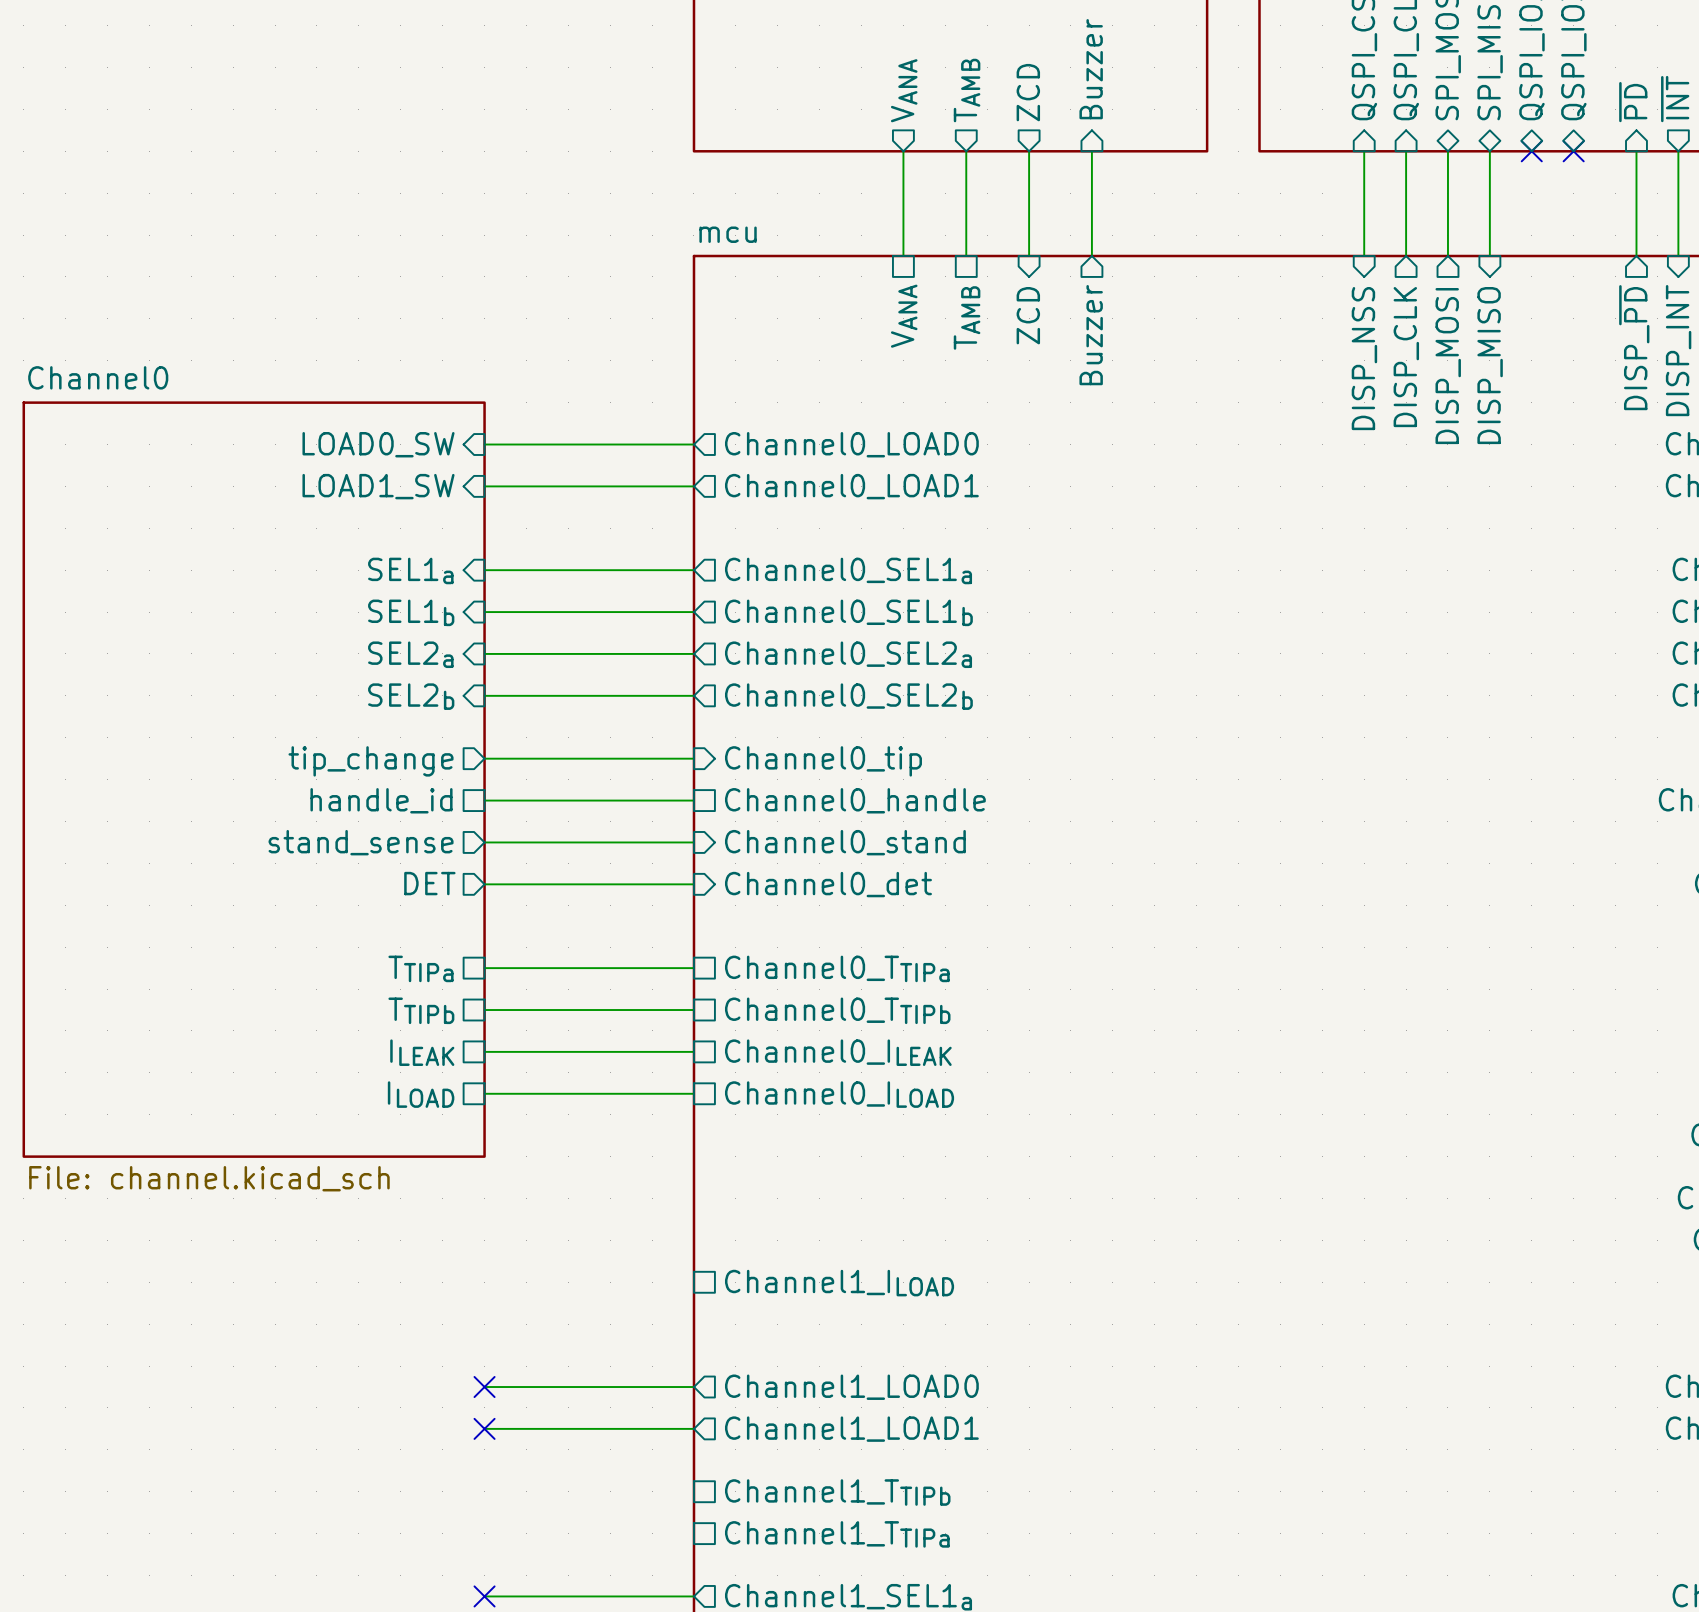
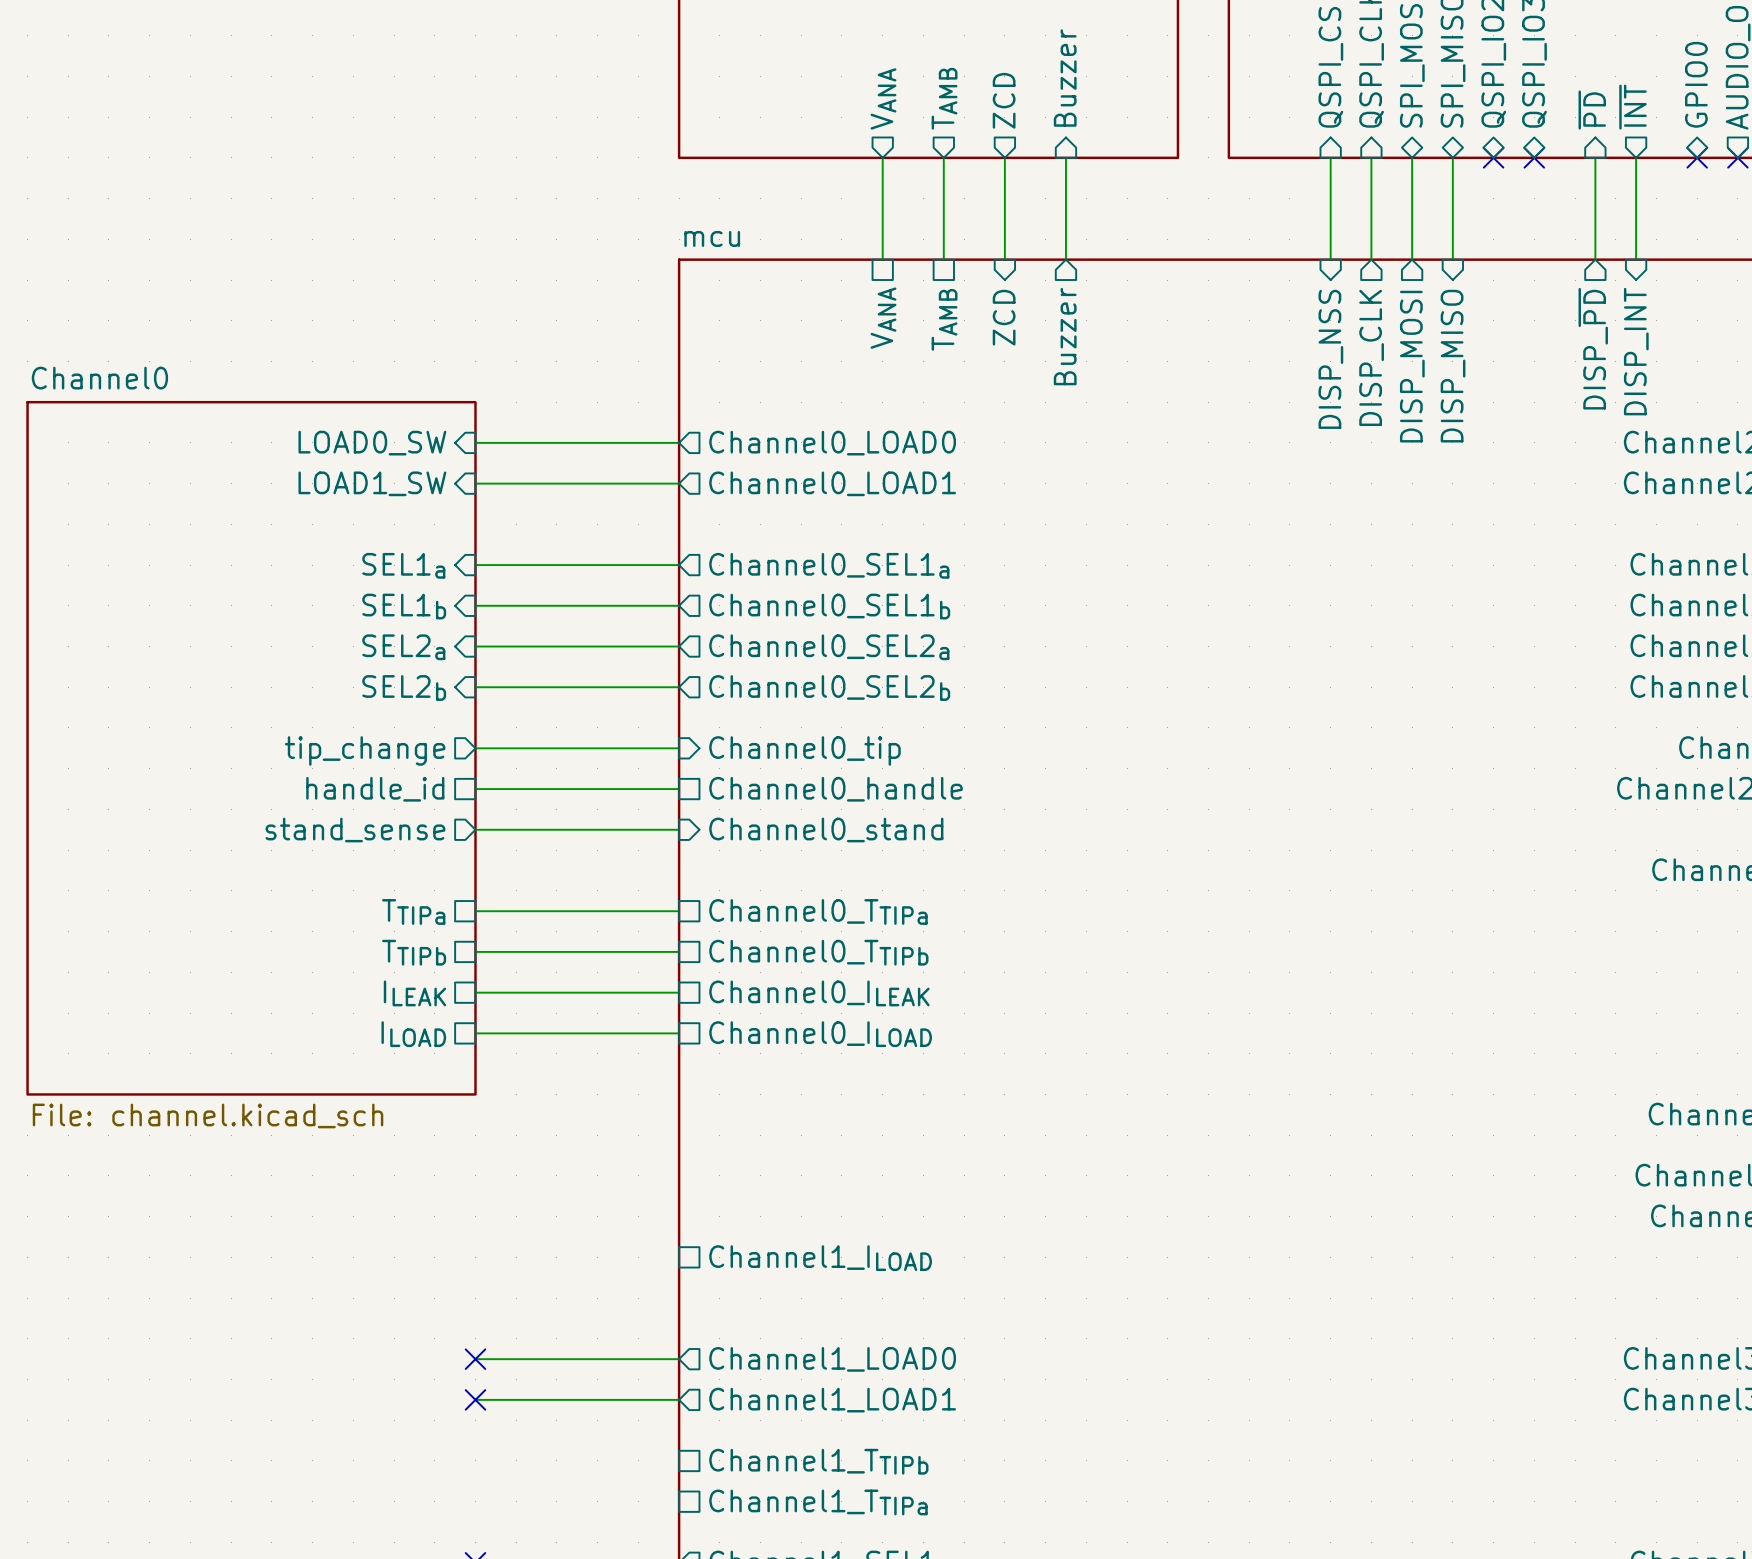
sheet Channel0 shape: [22, 401, 486, 1158] -> [26, 400, 477, 1096]
sheet pin: DET (429, 883) -> none
wire: (484, 884) (693, 884) -> (475, 911) (679, 911)
sheet pin: Channel0_det (828, 884) -> none
sheet pin: none -> TTIPa (413, 911)
sheet pin: none -> Channel0_TTIPa (818, 911)
sheet pin: TTIPa (420, 968) -> TTIPb (414, 952)
sheet pin: Channel0_TTIPa (837, 968) -> Channel0_TTIPb (818, 952)
sheet pin: TTIPb (421, 1010) -> ILEAK (414, 993)
sheet pin: Channel0_TTIPb (837, 1010) -> Channel0_ILEAK (819, 993)
sheet pin: ILEAK (422, 1052) -> ILOAD (413, 1034)
sheet pin: Channel0_ILEAK (838, 1052) -> Channel0_ILOAD (820, 1034)
wire: (484, 1093) (693, 1093) -> none
sheet pin: ILOAD (421, 1094) -> none
sheet pin: Channel0_ILOAD (839, 1094) -> none

